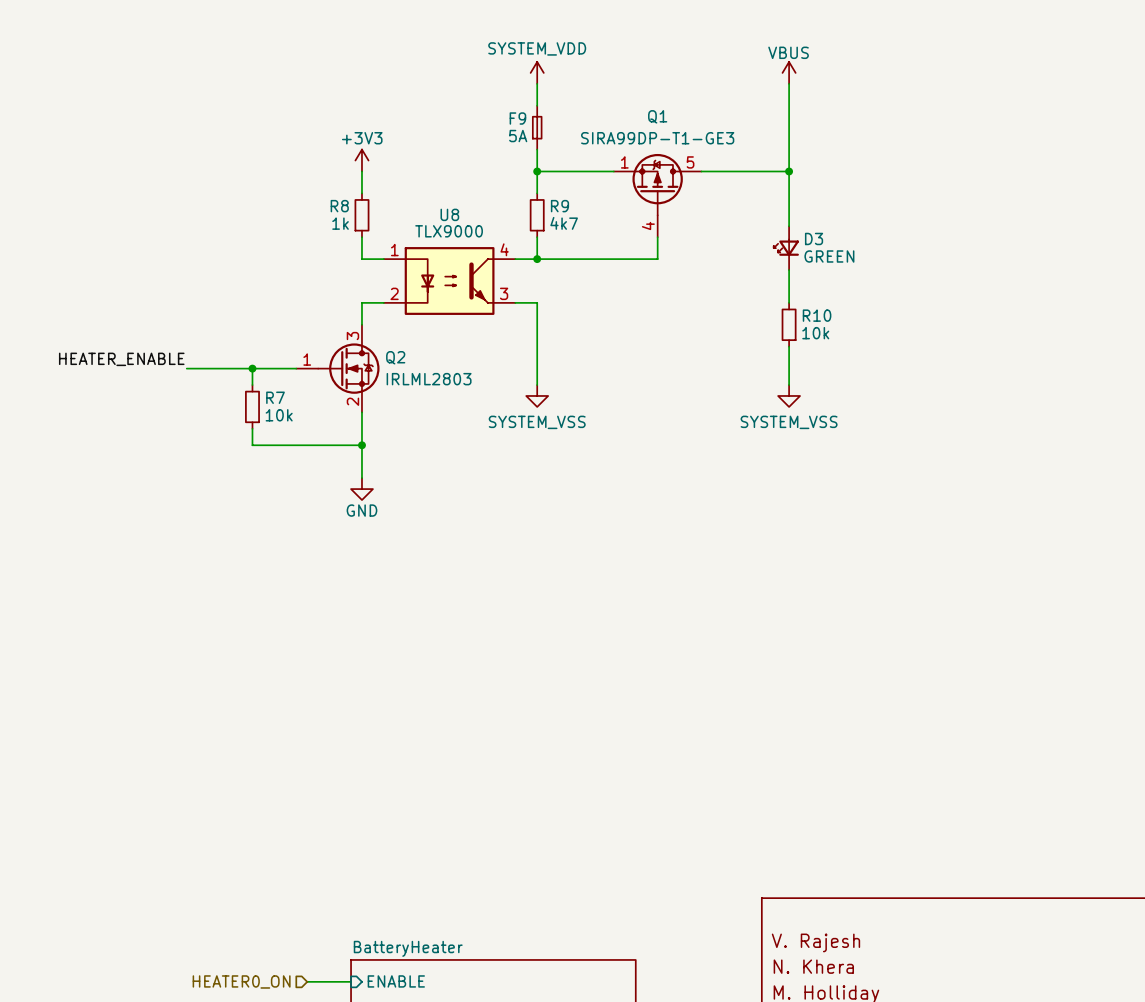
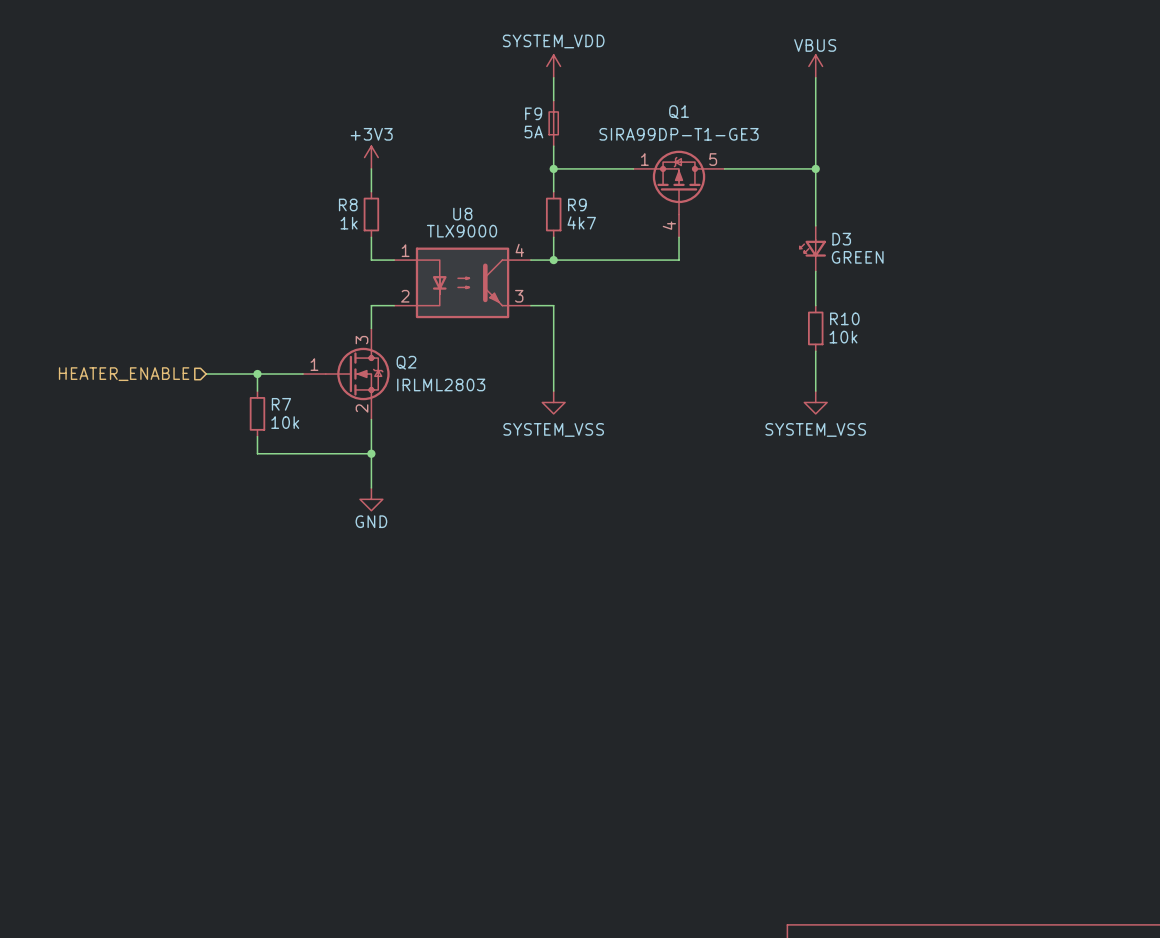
label: HEATER_ENABLE (121, 359) -> none
hierarchical label: none -> HEATER_ENABLE (124, 374)
wire: (186, 368) (203, 368) -> none

